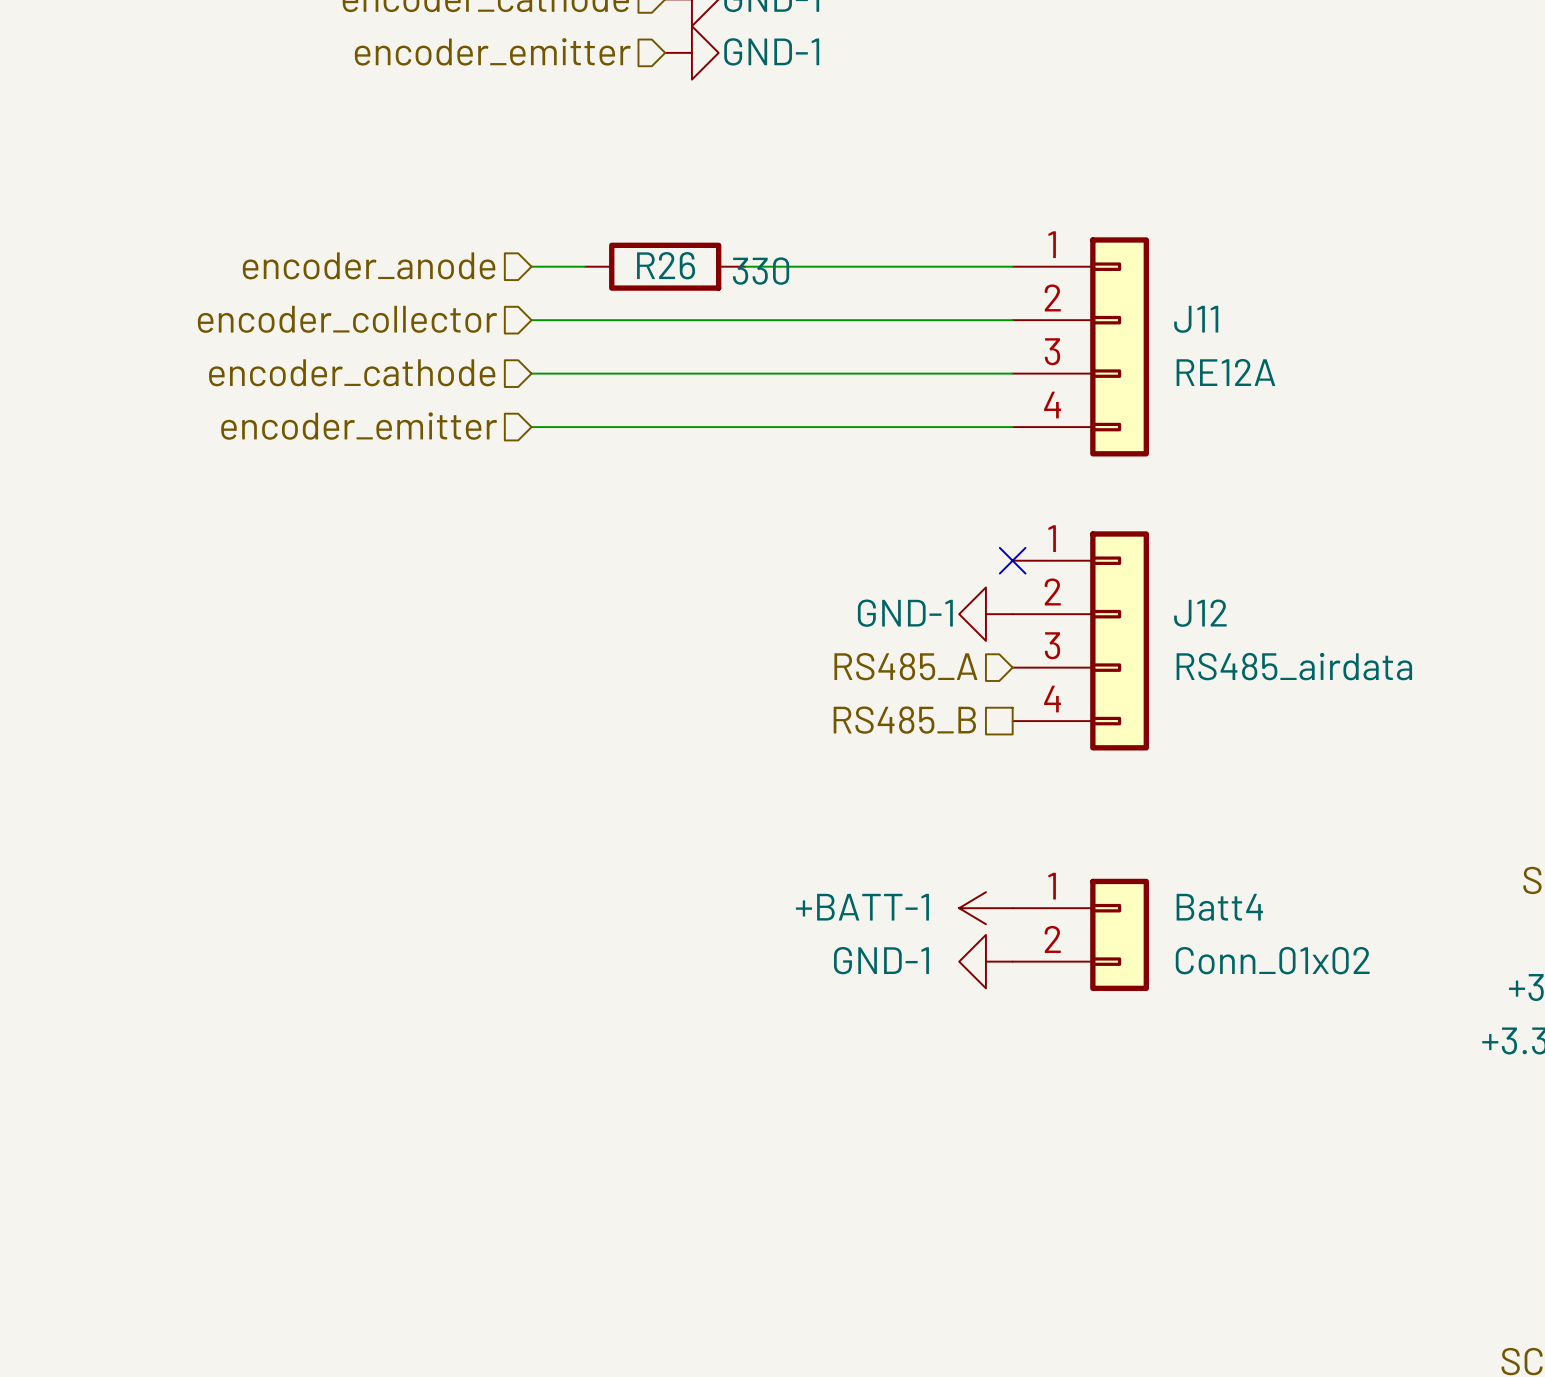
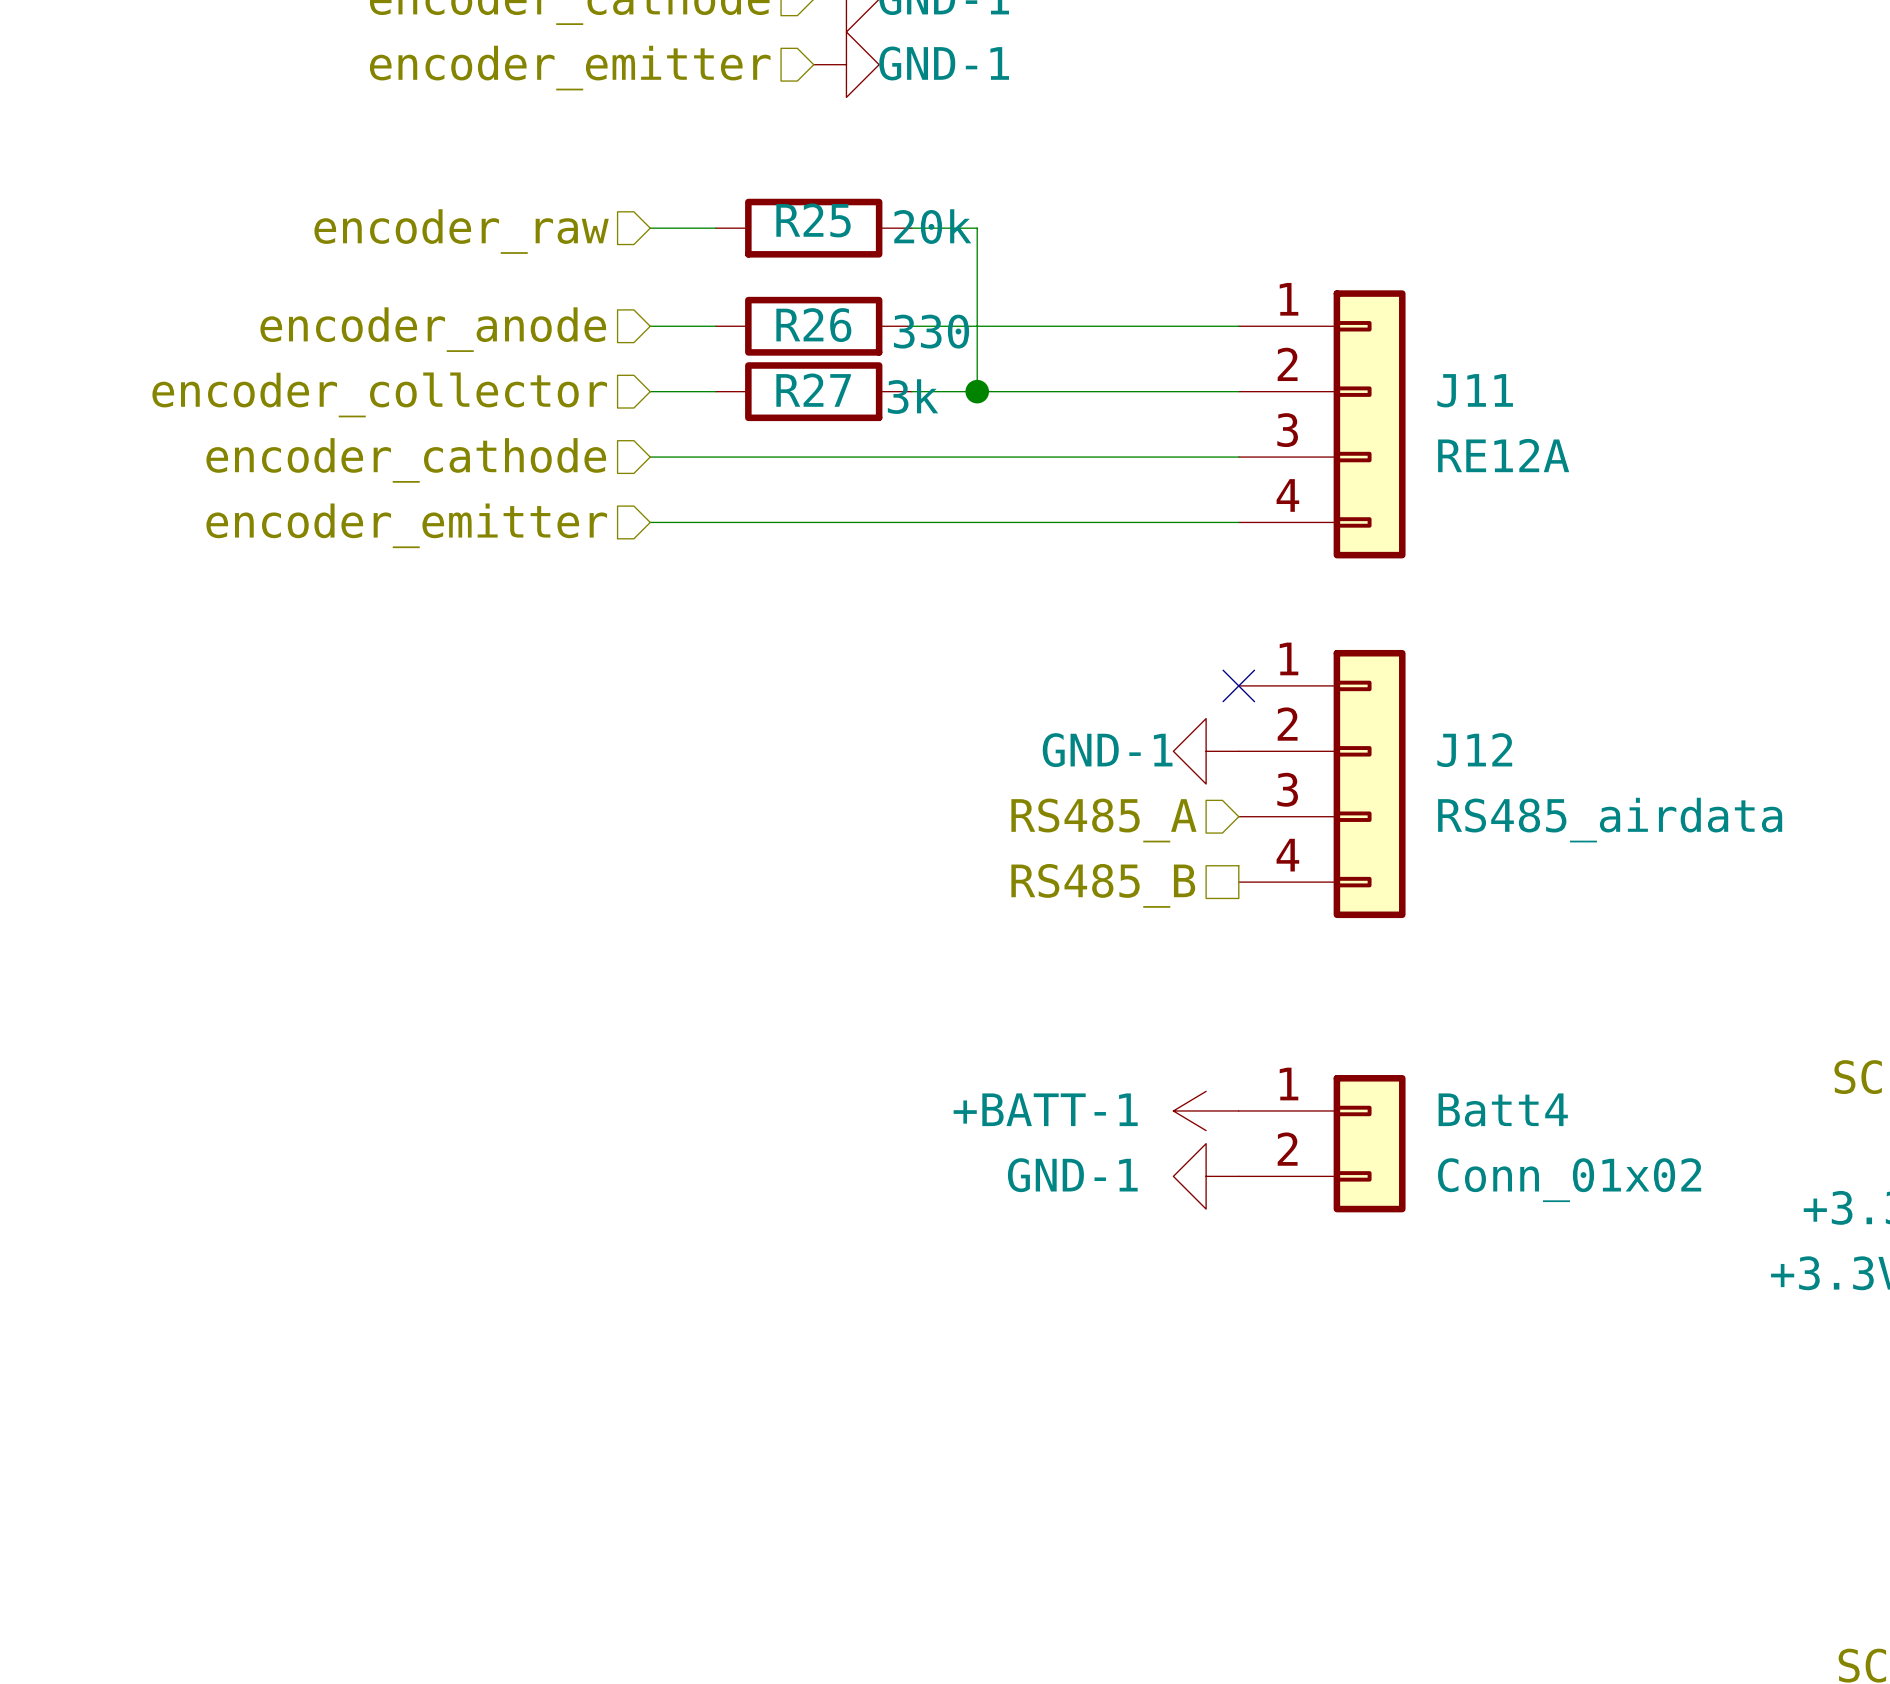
hierarchical label: none -> encoder_raw (461, 231)
wire: none -> (650, 228) (715, 228)
R25: none -> 20k (813, 228)
wire: none -> (911, 228) (977, 228) (977, 391)
wire: (585, 320) (745, 320) -> none
R27: none -> 3k (813, 391)
junction: none -> (977, 391)

